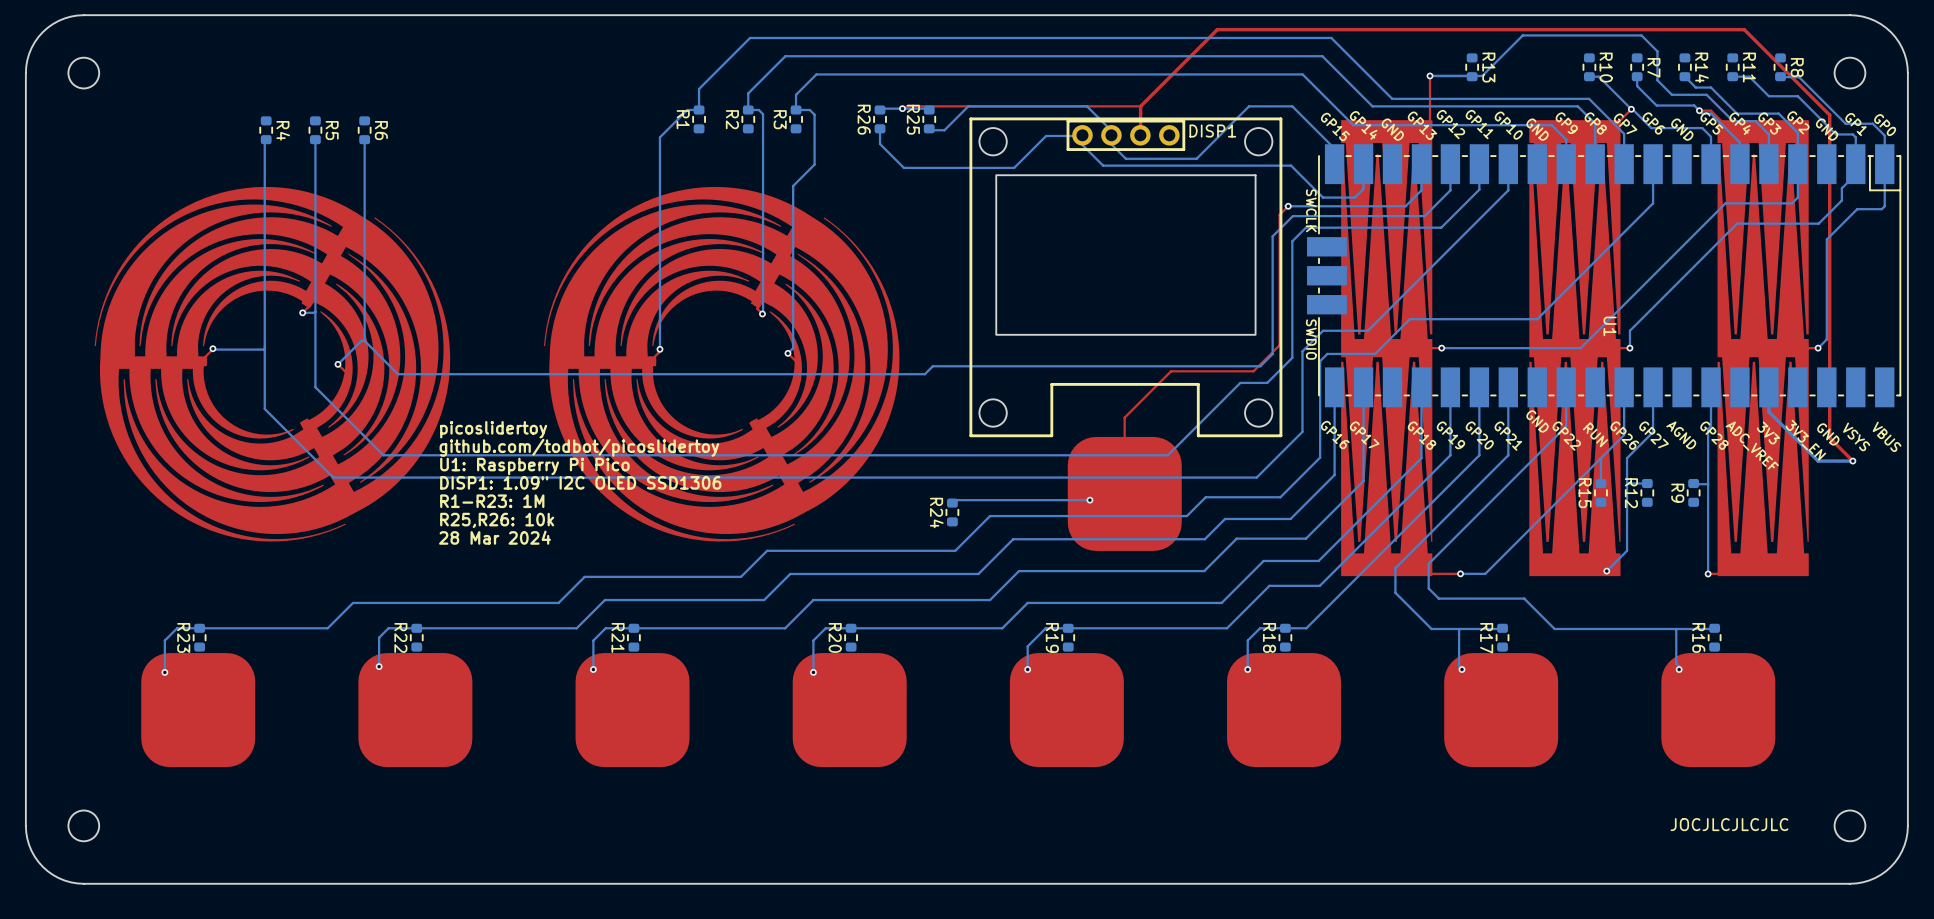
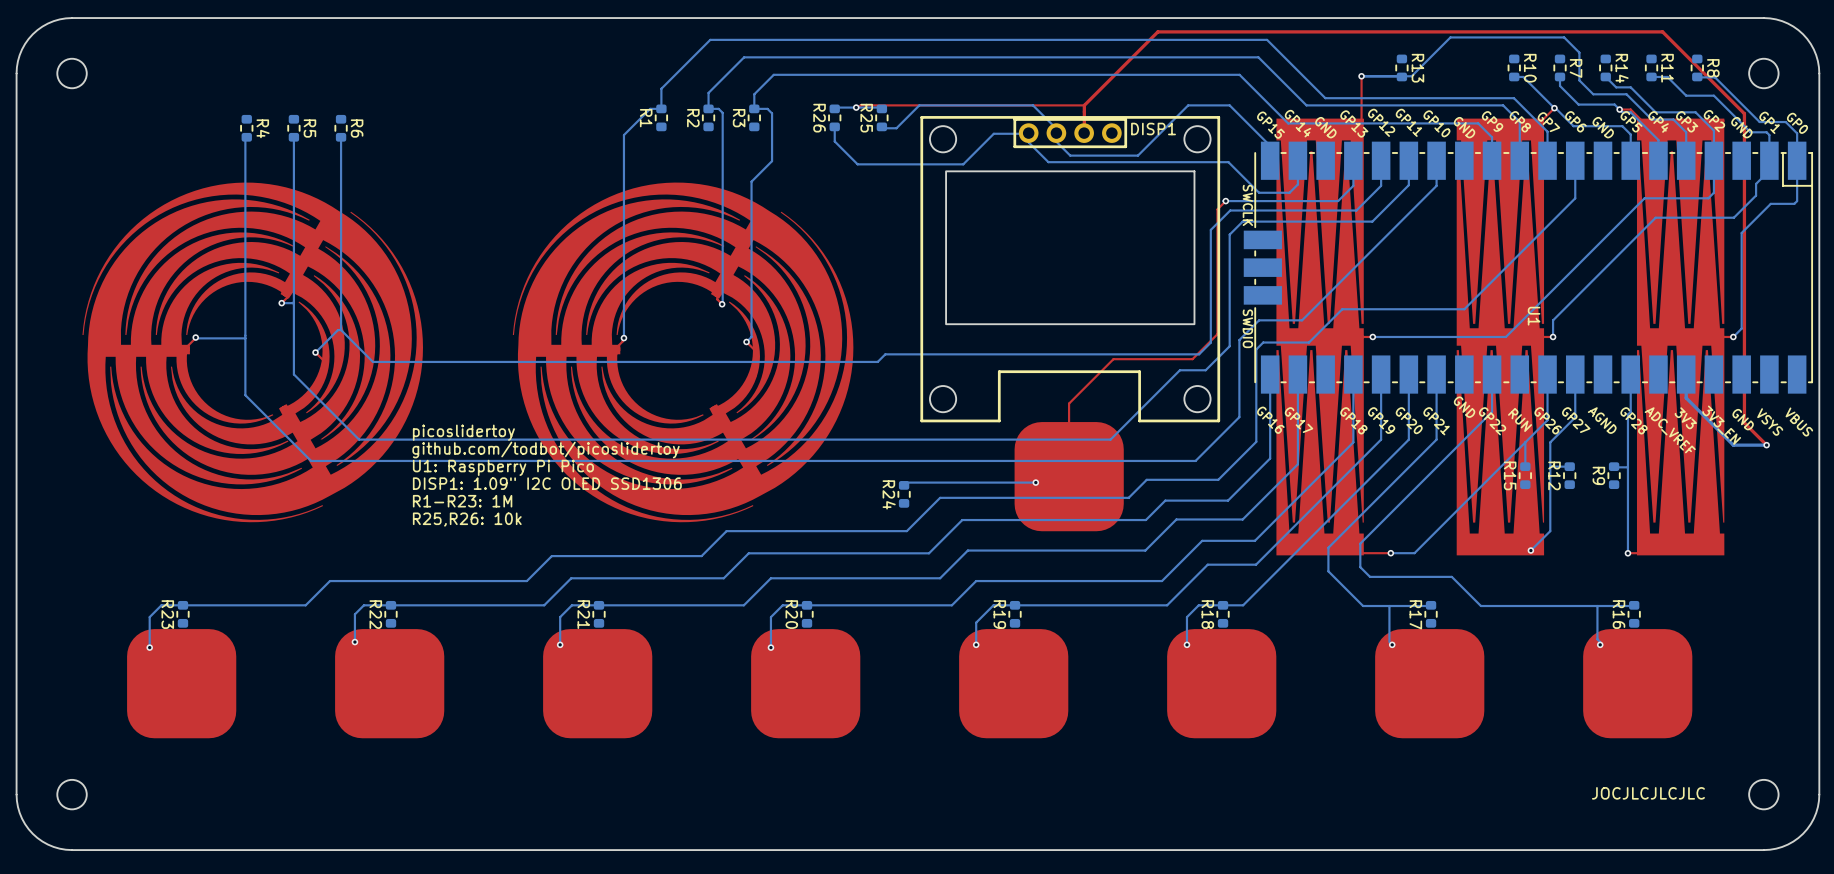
text: picoslidertoy (493, 429) -> none
text: github.com/todbot/picoslidertoy (579, 447) -> picoslidertoy (463, 432)
text: U1: Raspberry Pi Pico (534, 466) -> github.com/todbot/picoslidertoy (546, 450)
text: DISP1: 1.09" I2C OLED SSD1306 (580, 482) -> U1: Raspberry Pi Pico (503, 467)
text: R1-R23: 1M (492, 501) -> DISP1: 1.09" I2C OLED SSD1306 (547, 483)
text: R25,R26: 10k (497, 520) -> R1-R23: 1M (462, 501)
text: 28 Mar 2024 (494, 537) -> R25,R26: 10k (467, 519)

